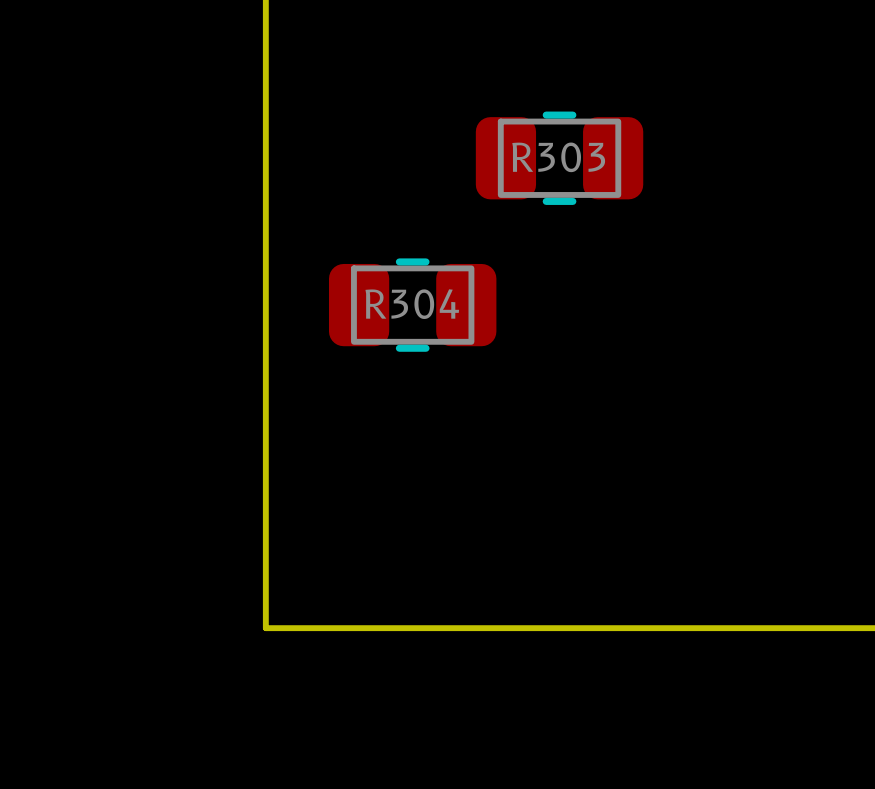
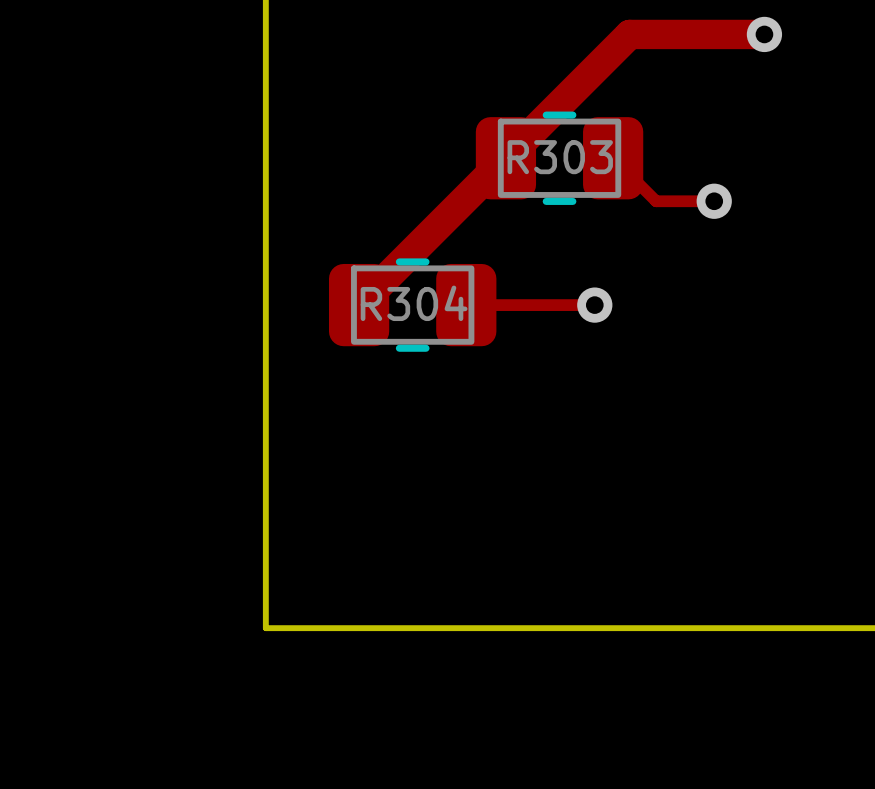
top track: none -> (764, 34) (629, 34) (359, 305)
via: none -> (764, 34)
top track: none -> (613, 158) (656, 201) (714, 201)
via: none -> (714, 201)
top track: none -> (466, 305) (594, 305)
via: none -> (594, 305)

